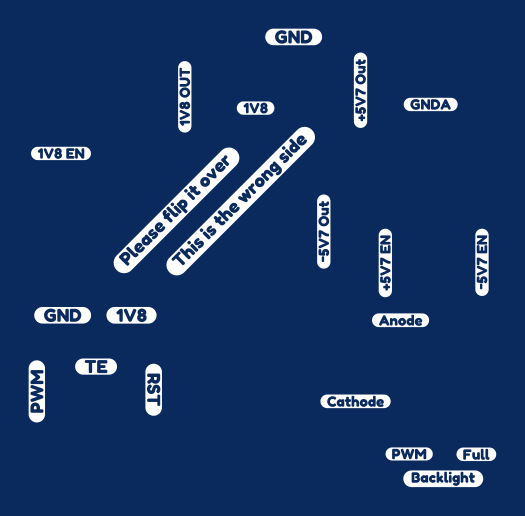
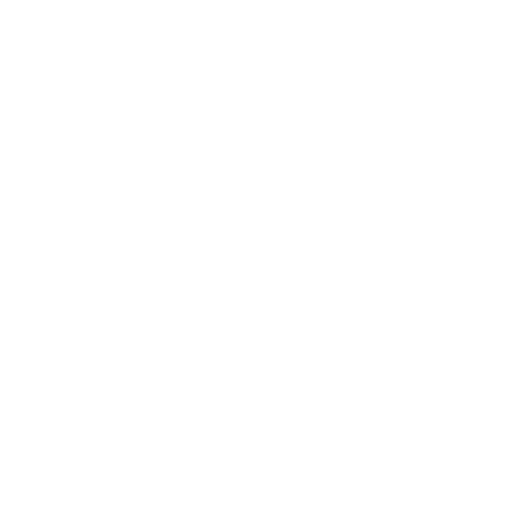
drawing: [265, 28, 323, 46] -> none
drawing: [353, 52, 368, 128] -> none
drawing: [113, 61, 331, 276] -> none
drawing: [403, 97, 458, 112] -> none
drawing: [31, 146, 91, 161] -> none
drawing: [378, 228, 393, 298] -> none
drawing: [475, 228, 489, 296] -> none
drawing: [34, 306, 157, 324] -> none
drawing: [372, 313, 430, 328] -> none
drawing: [75, 358, 118, 375] -> none
drawing: [28, 360, 46, 423] -> none
drawing: [145, 363, 162, 416] -> none
drawing: [320, 394, 391, 409] -> none
drawing: [385, 447, 497, 488] -> none

